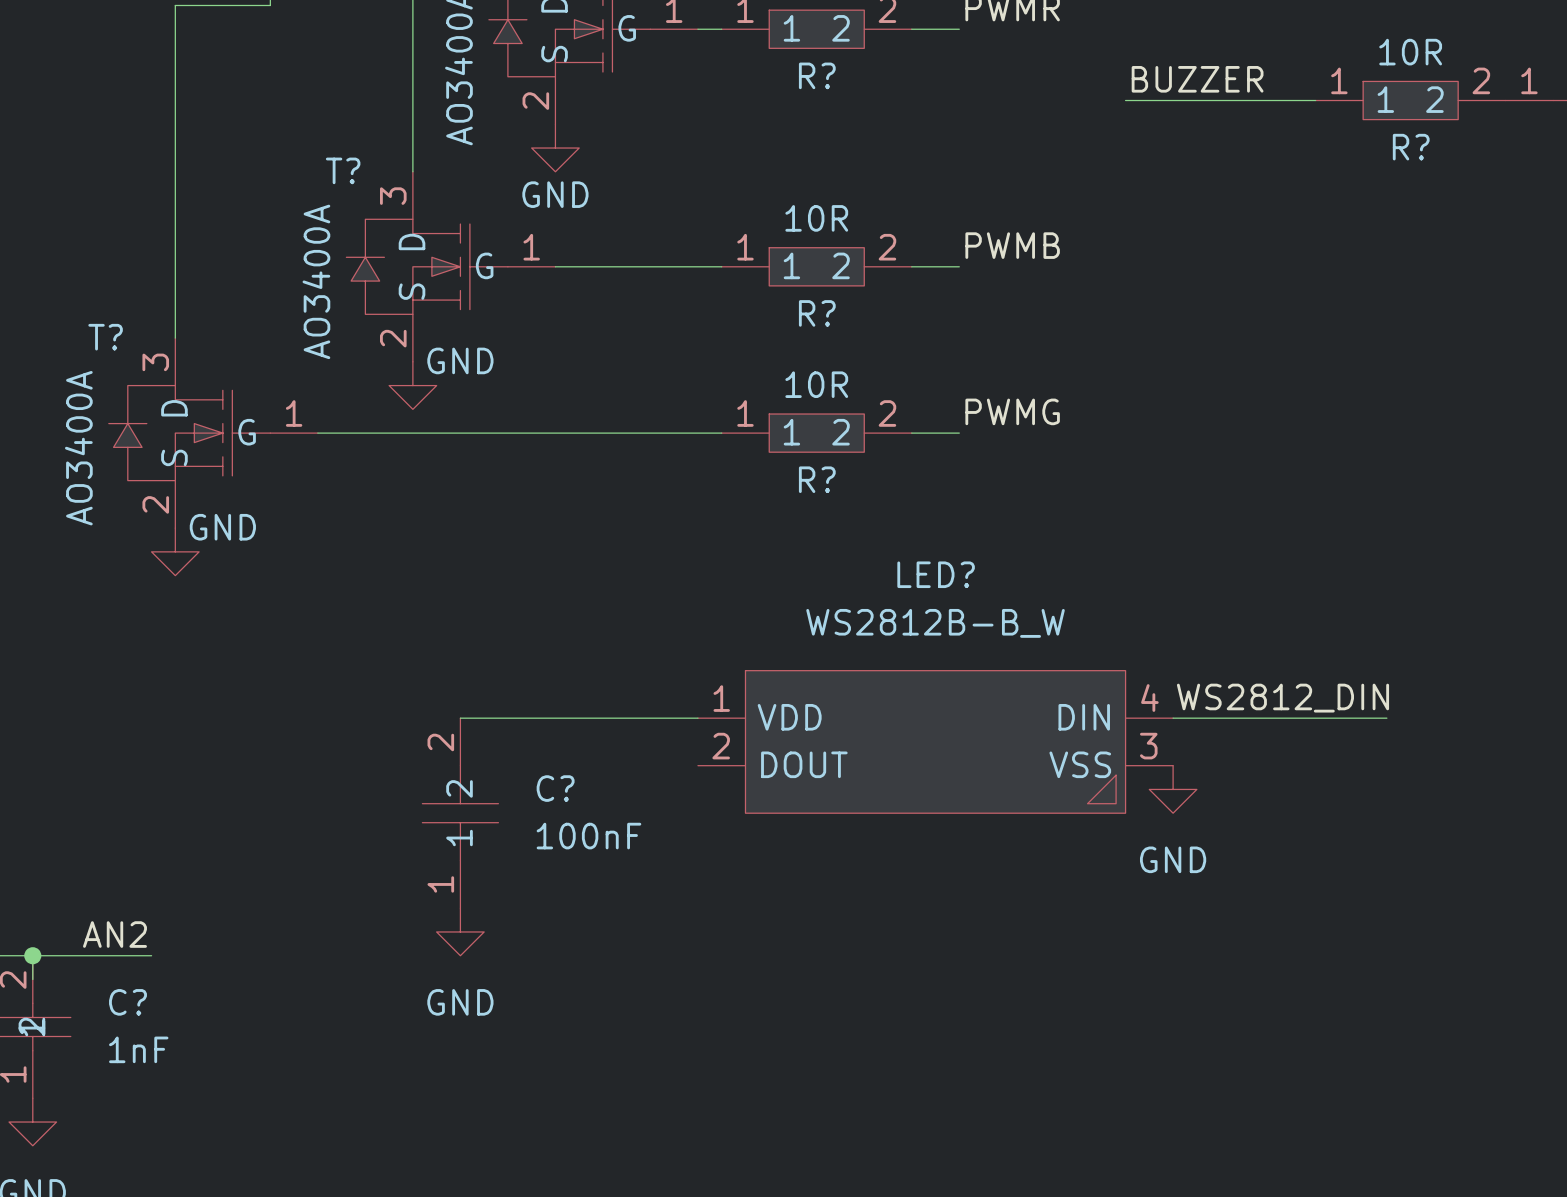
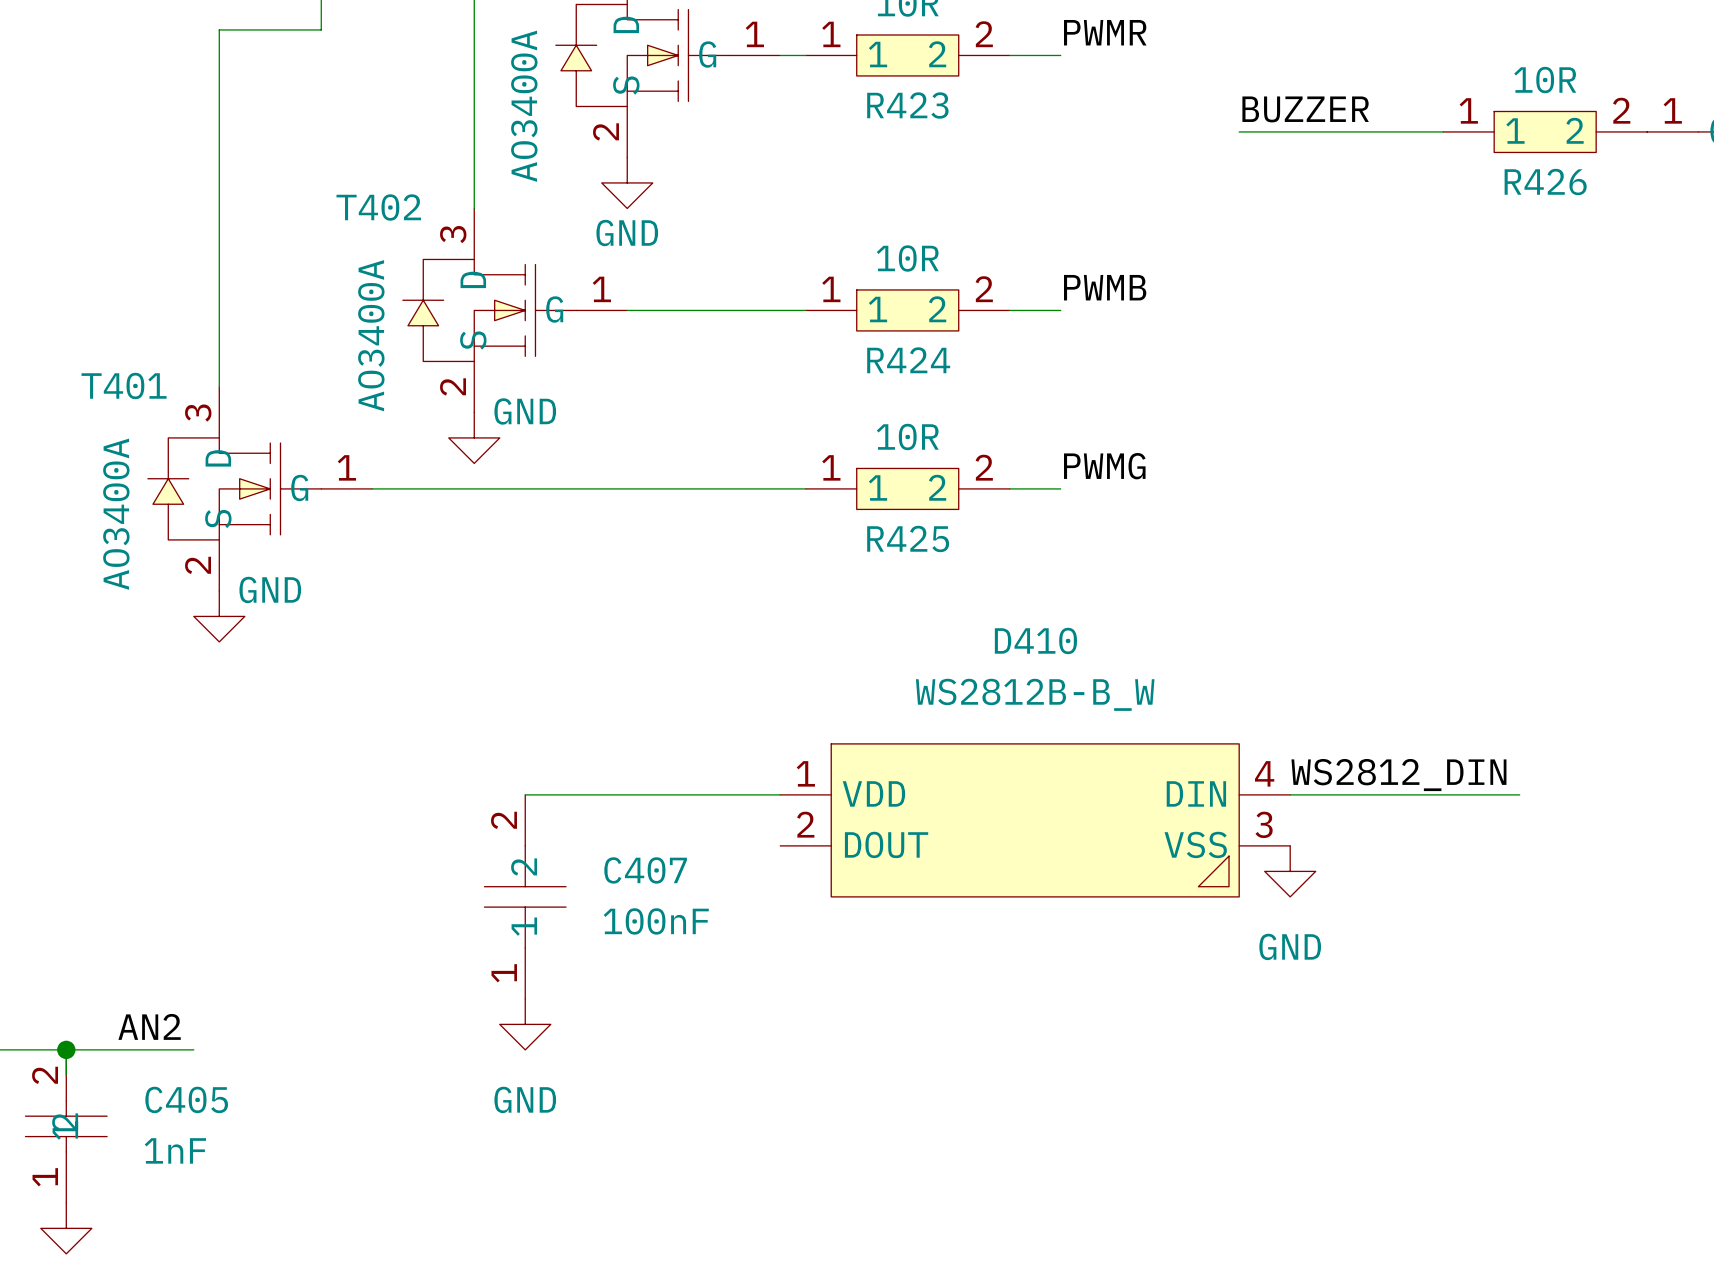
R? name: R? (817, 75) -> R423 (907, 105)
R? name: R? (1411, 147) -> R426 (1545, 182)
T? name: T? (343, 170) -> T402 (378, 207)
R? name: R? (817, 313) -> R424 (908, 360)
T? name: T? (105, 337) -> T401 (124, 385)
R? name: R? (817, 479) -> R425 (908, 538)
LED? name: LED? (936, 574) -> D410 (1035, 640)
C? name: C? (555, 788) -> C407 (645, 870)
C? name: C? (127, 1002) -> C405 (186, 1099)

